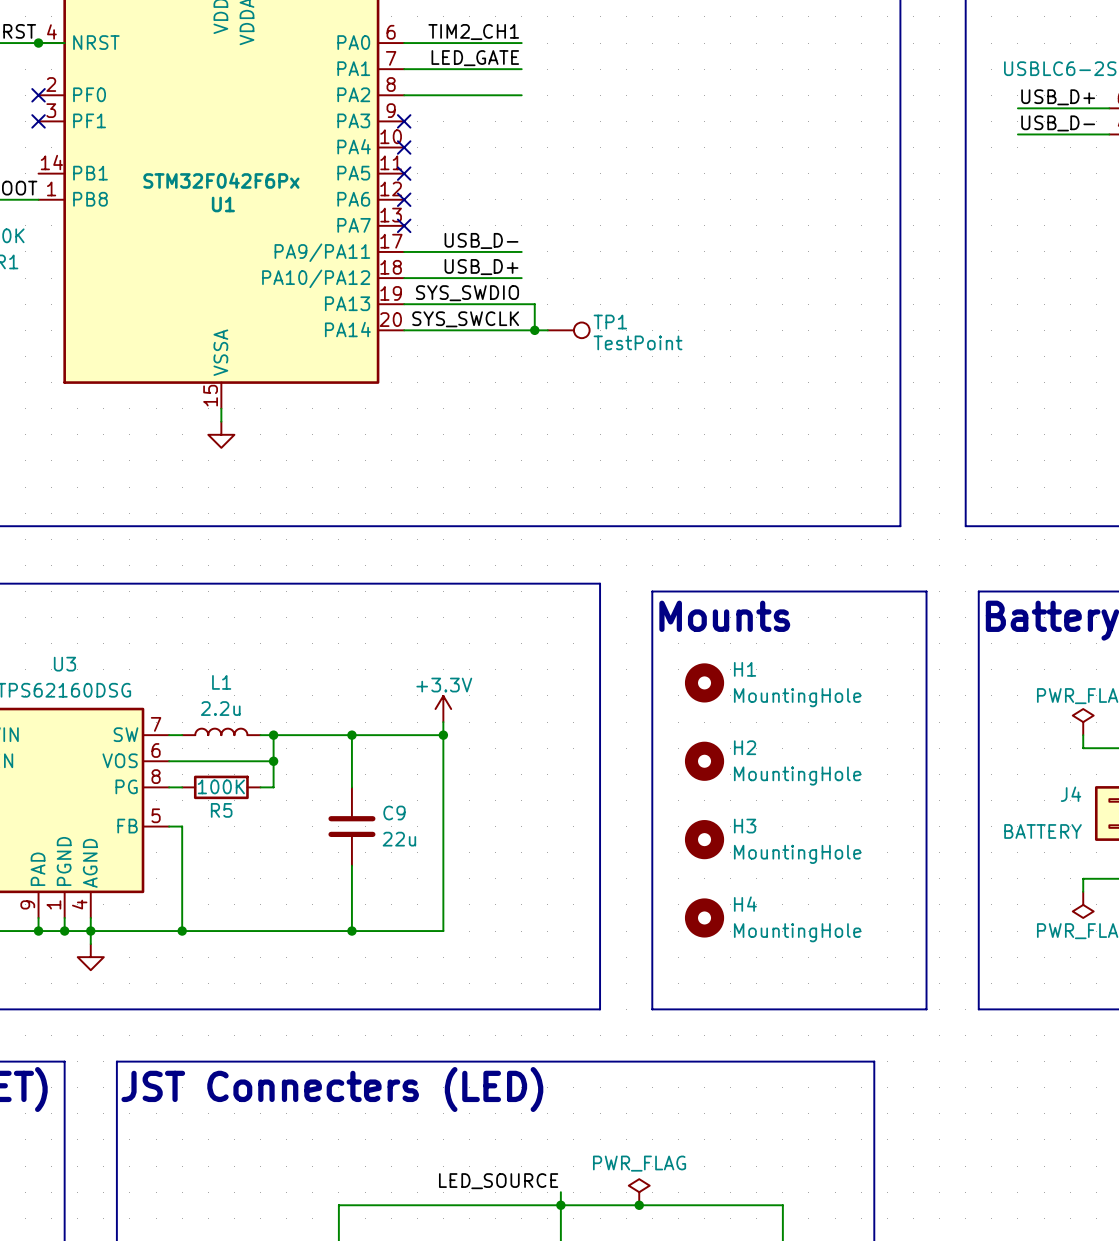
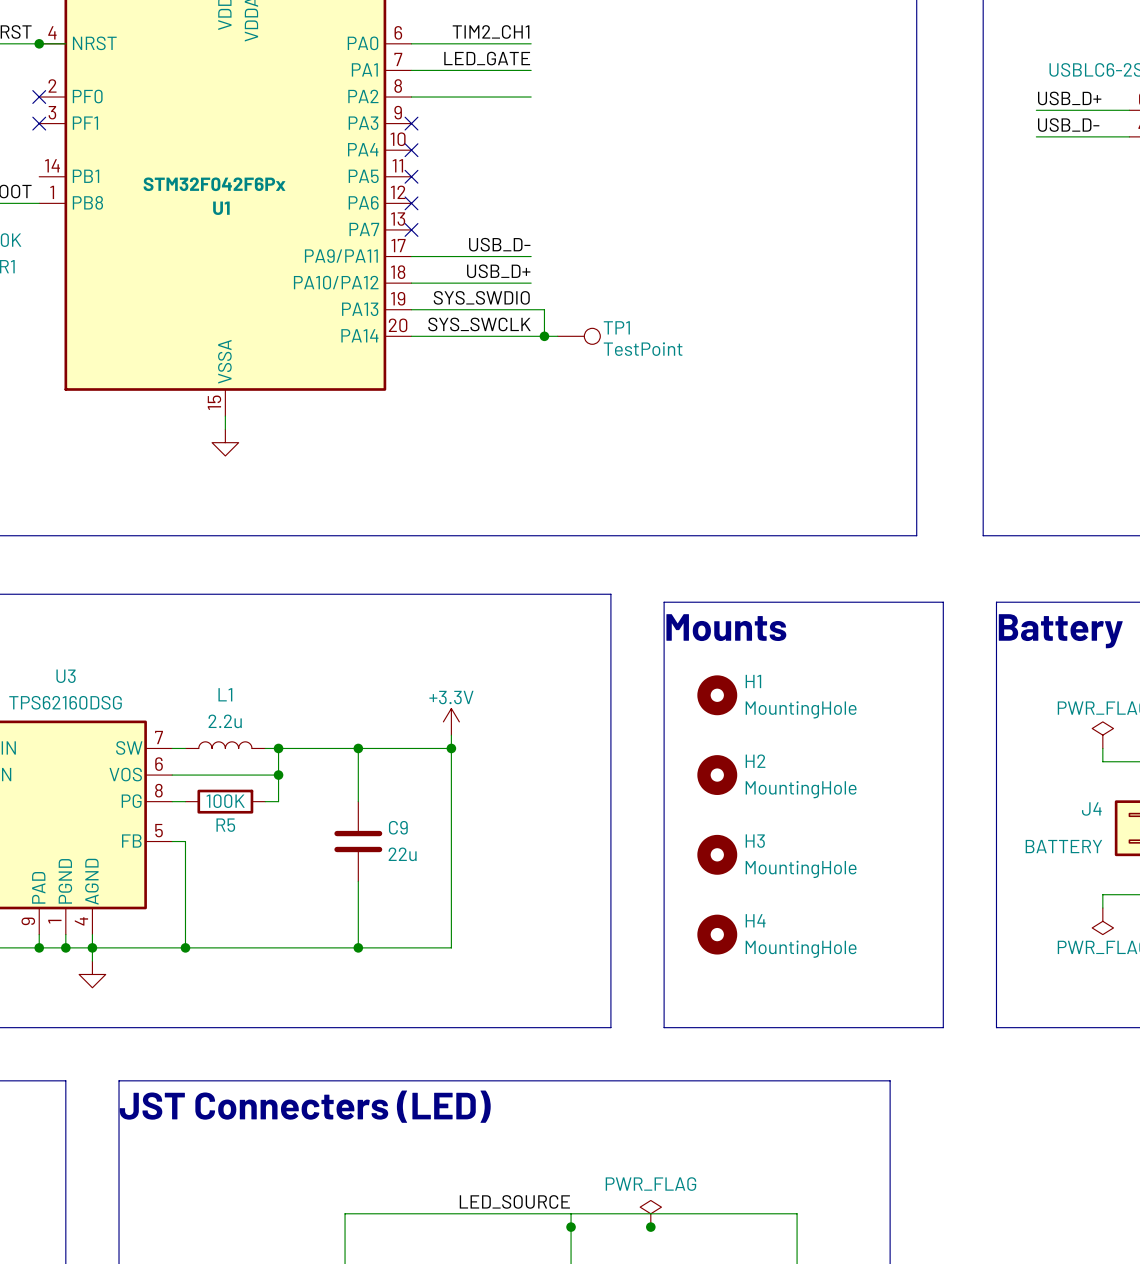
wire: (338, 1205) (782, 1205) -> (345, 1227) (345, 1213) (797, 1213) (797, 1227)

